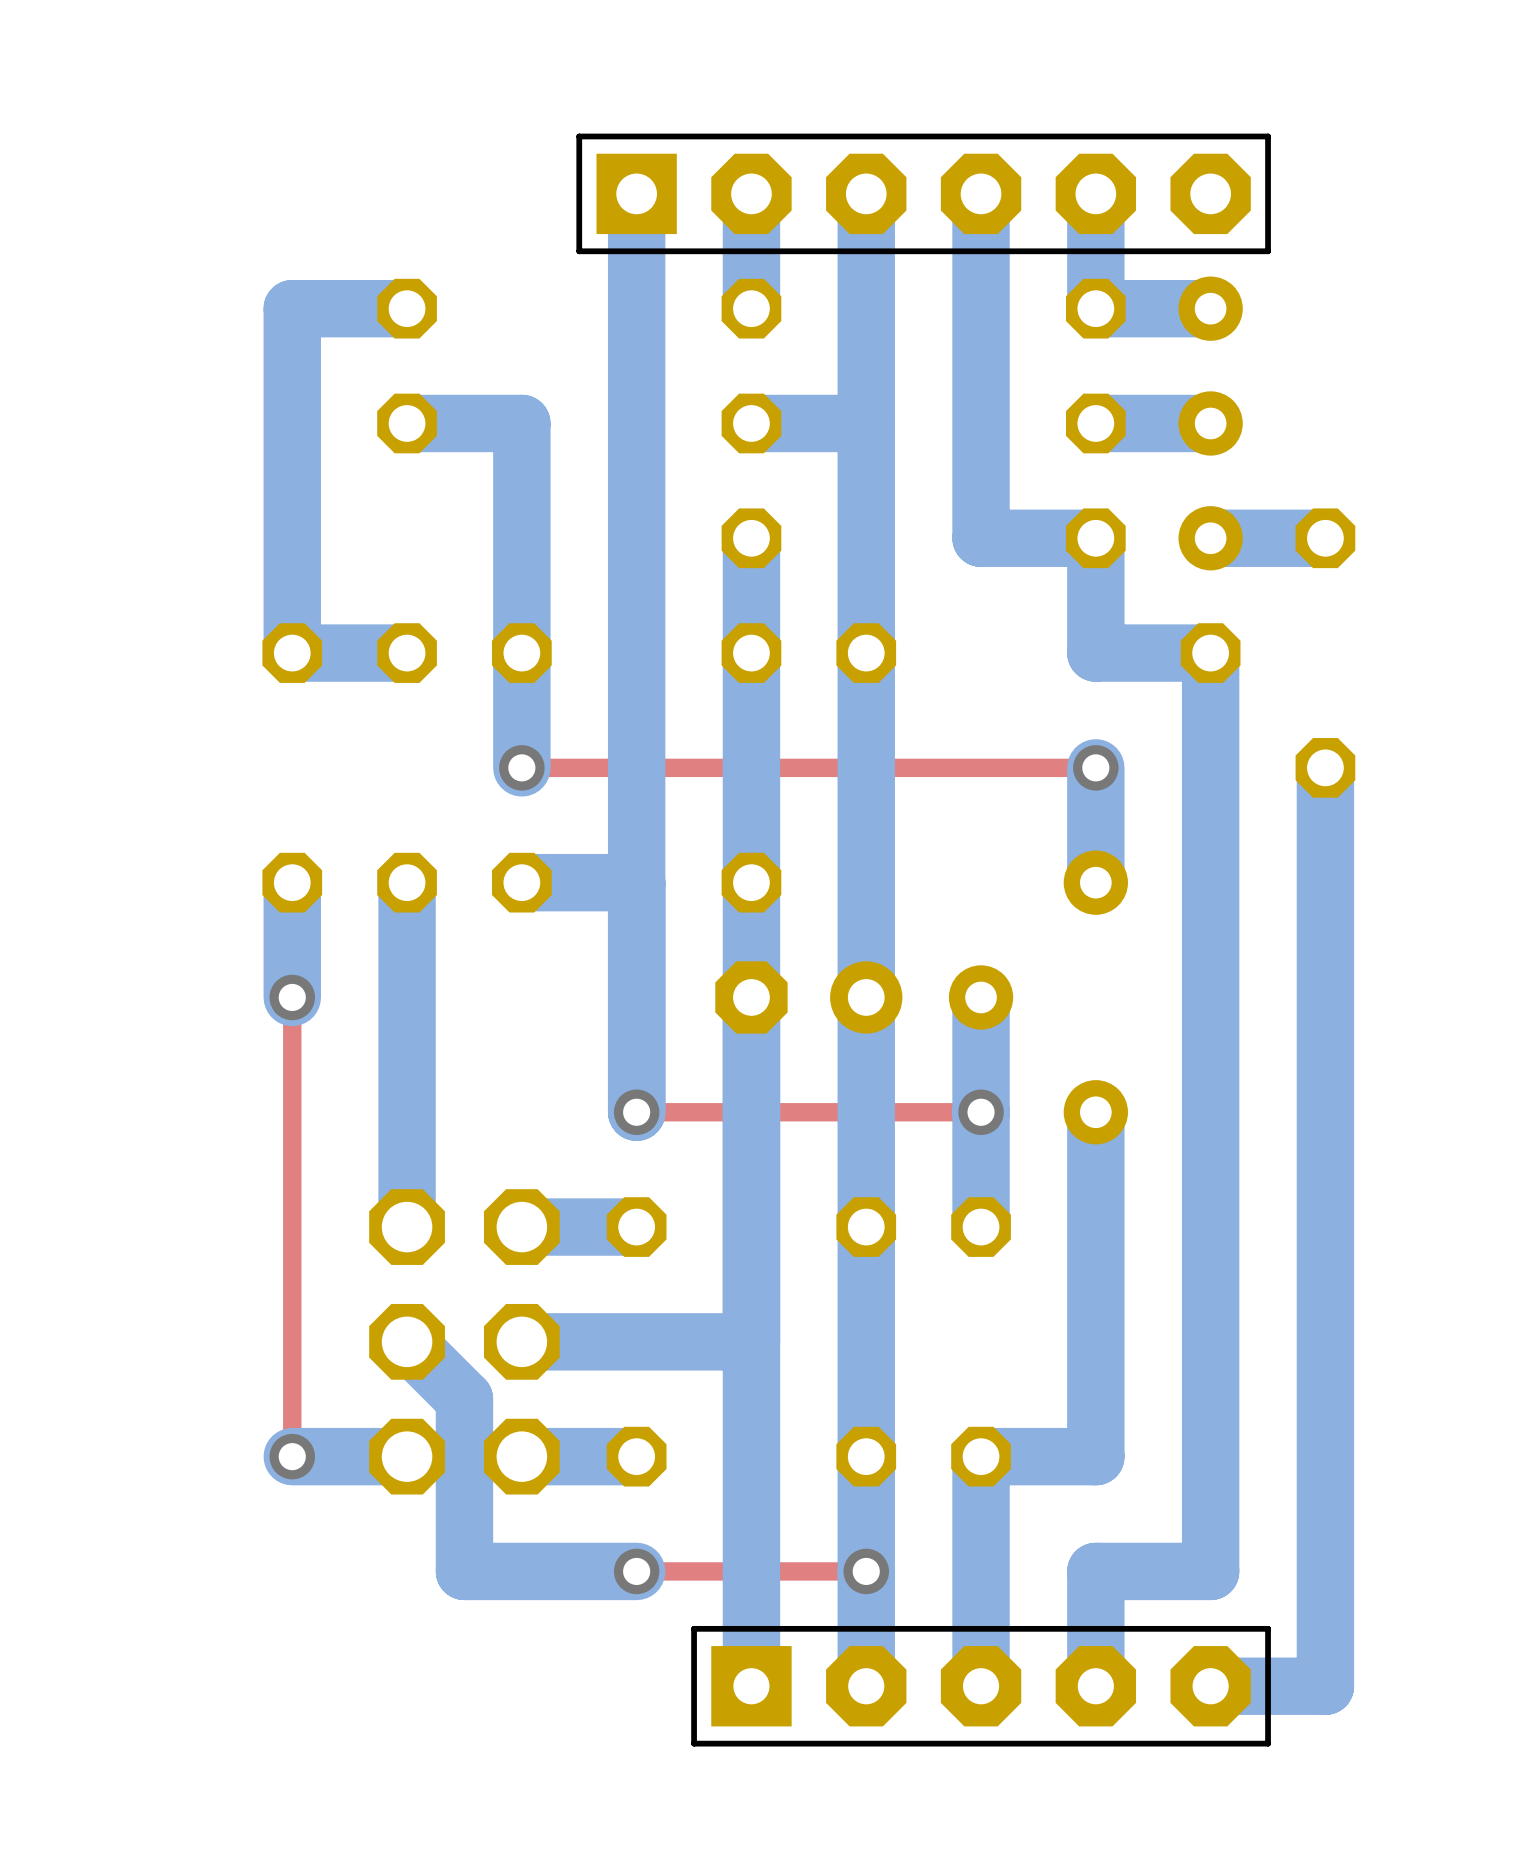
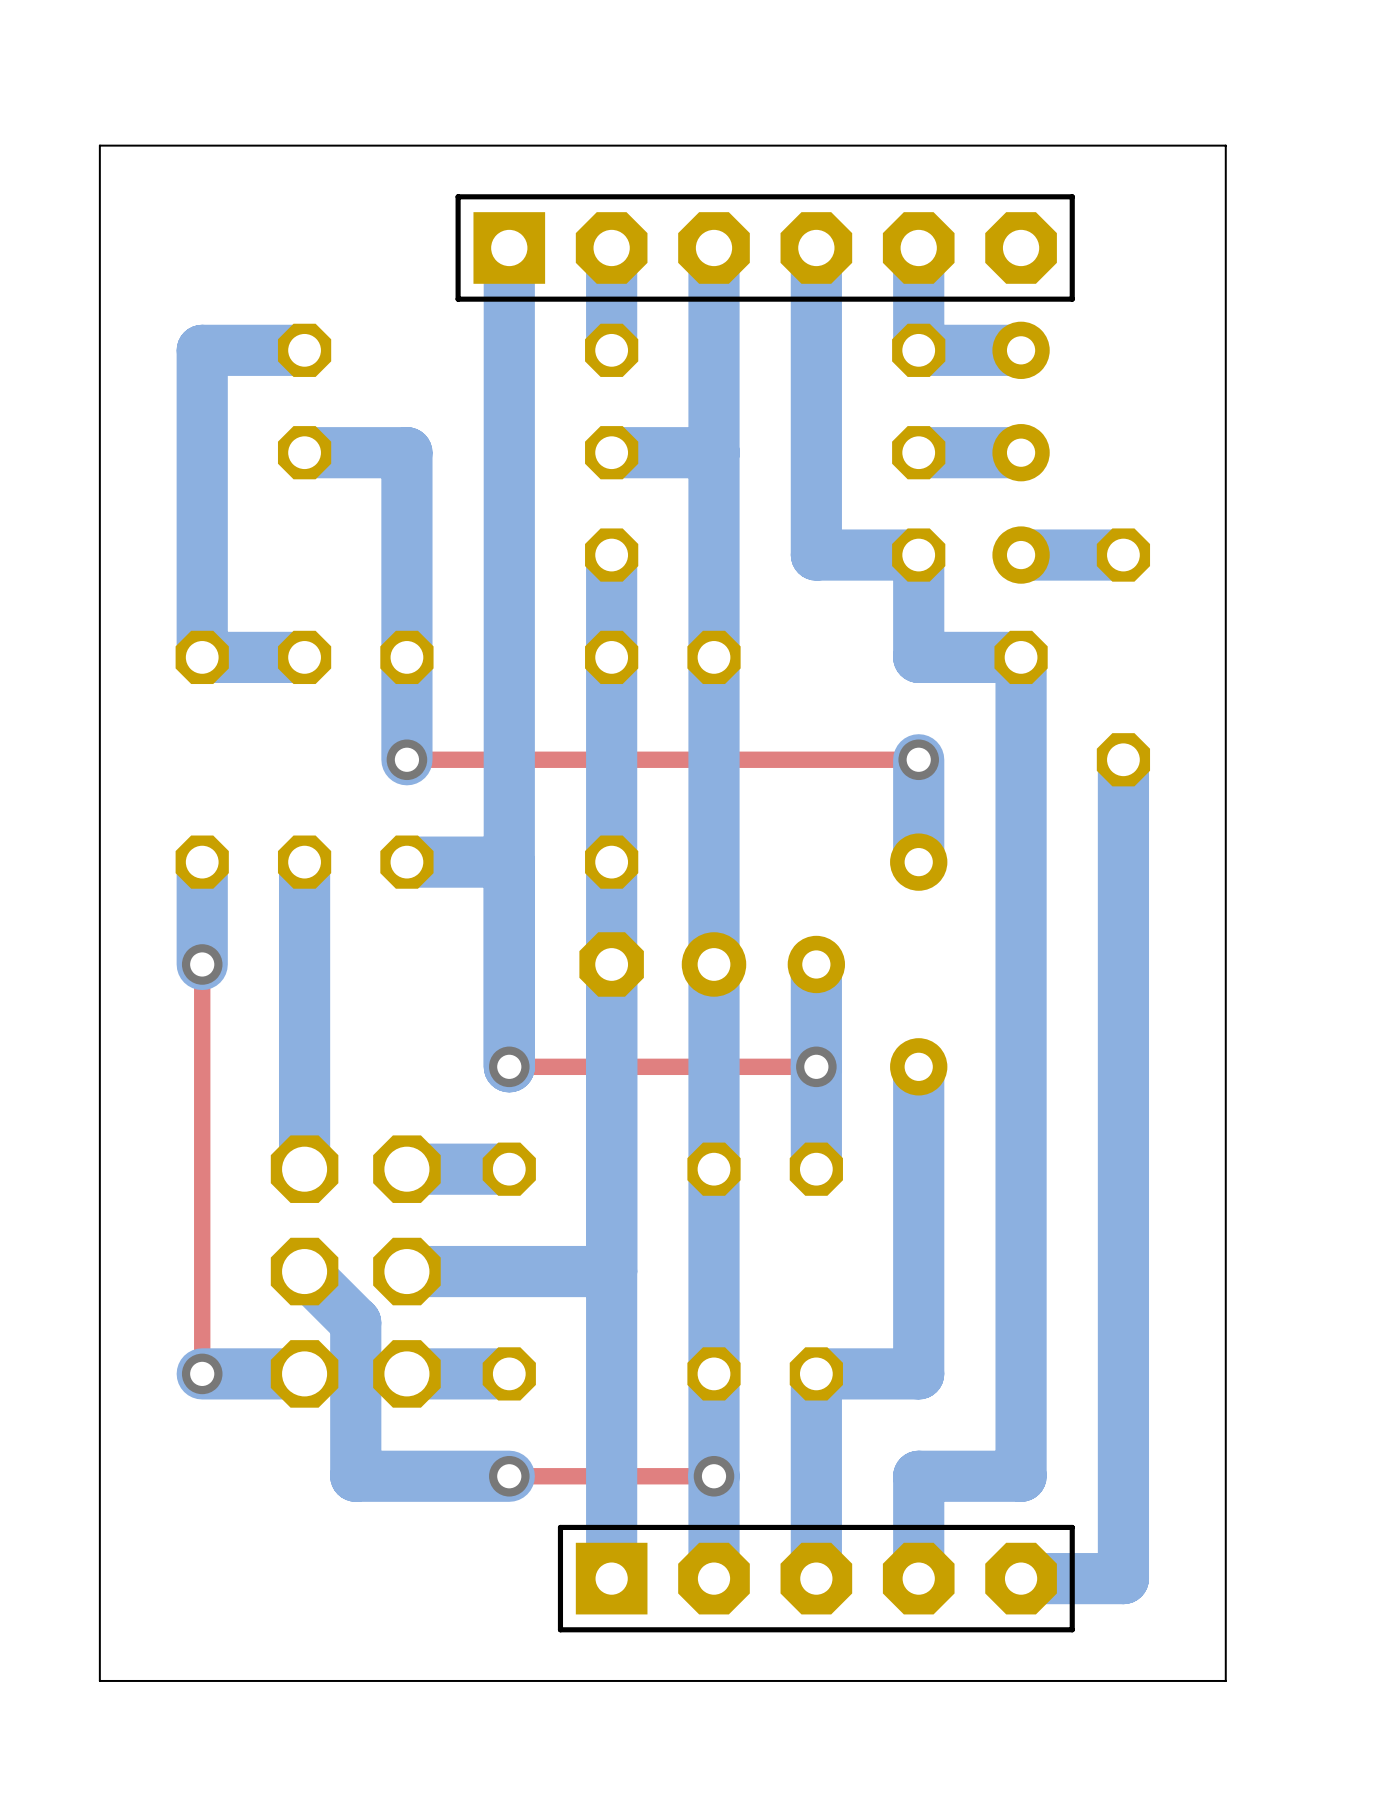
board edge: none -> (1225, 145) (99, 145) (99, 1680) (1225, 1680) (1225, 145)

